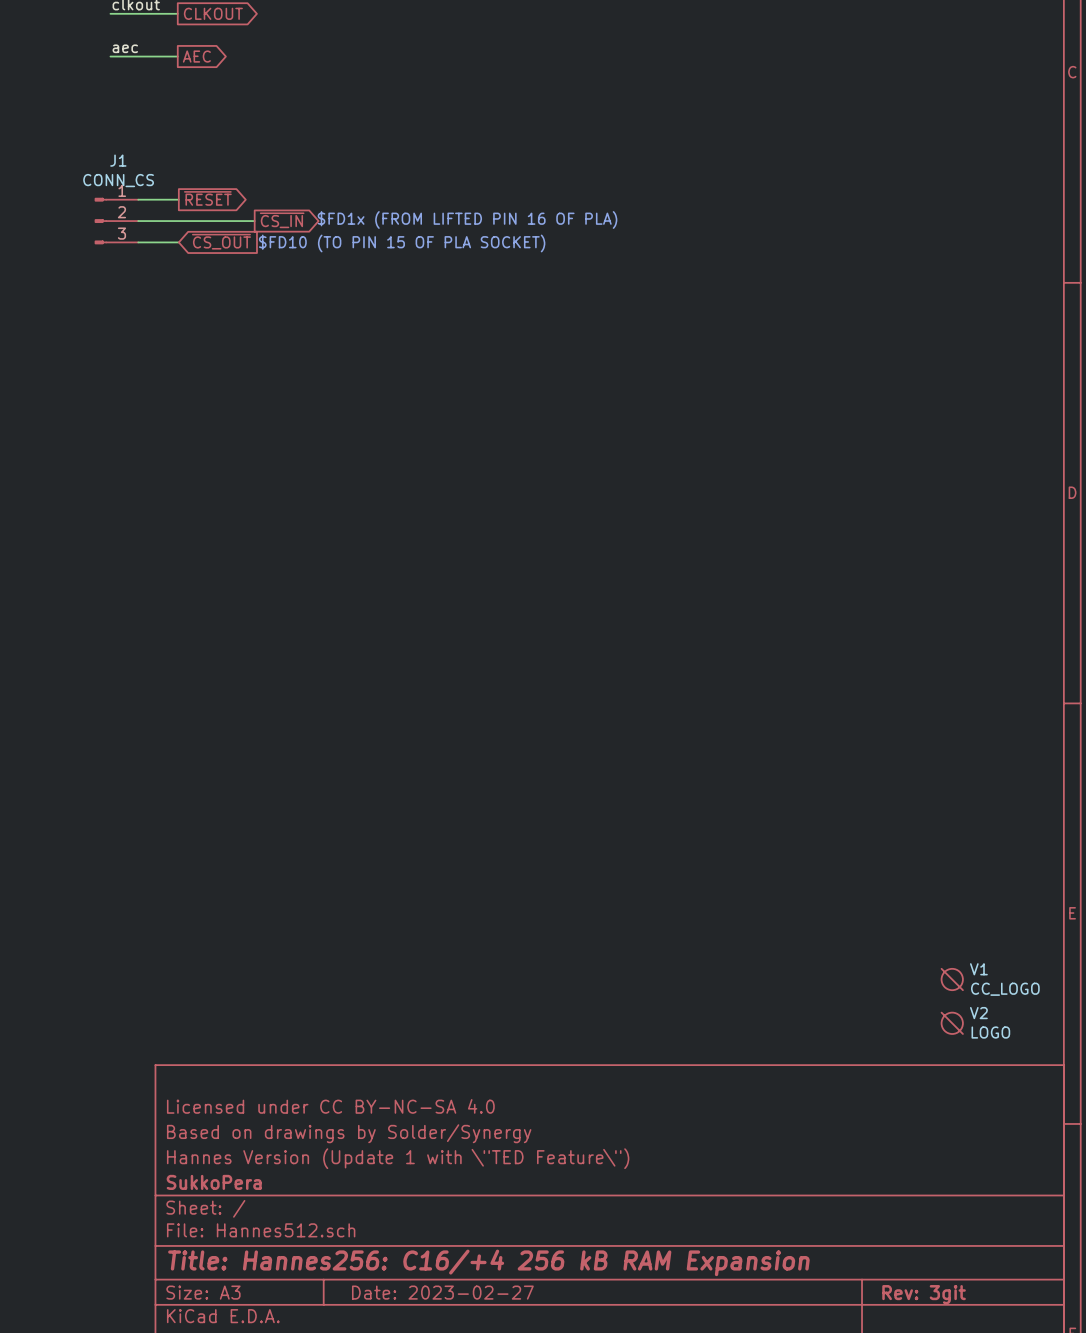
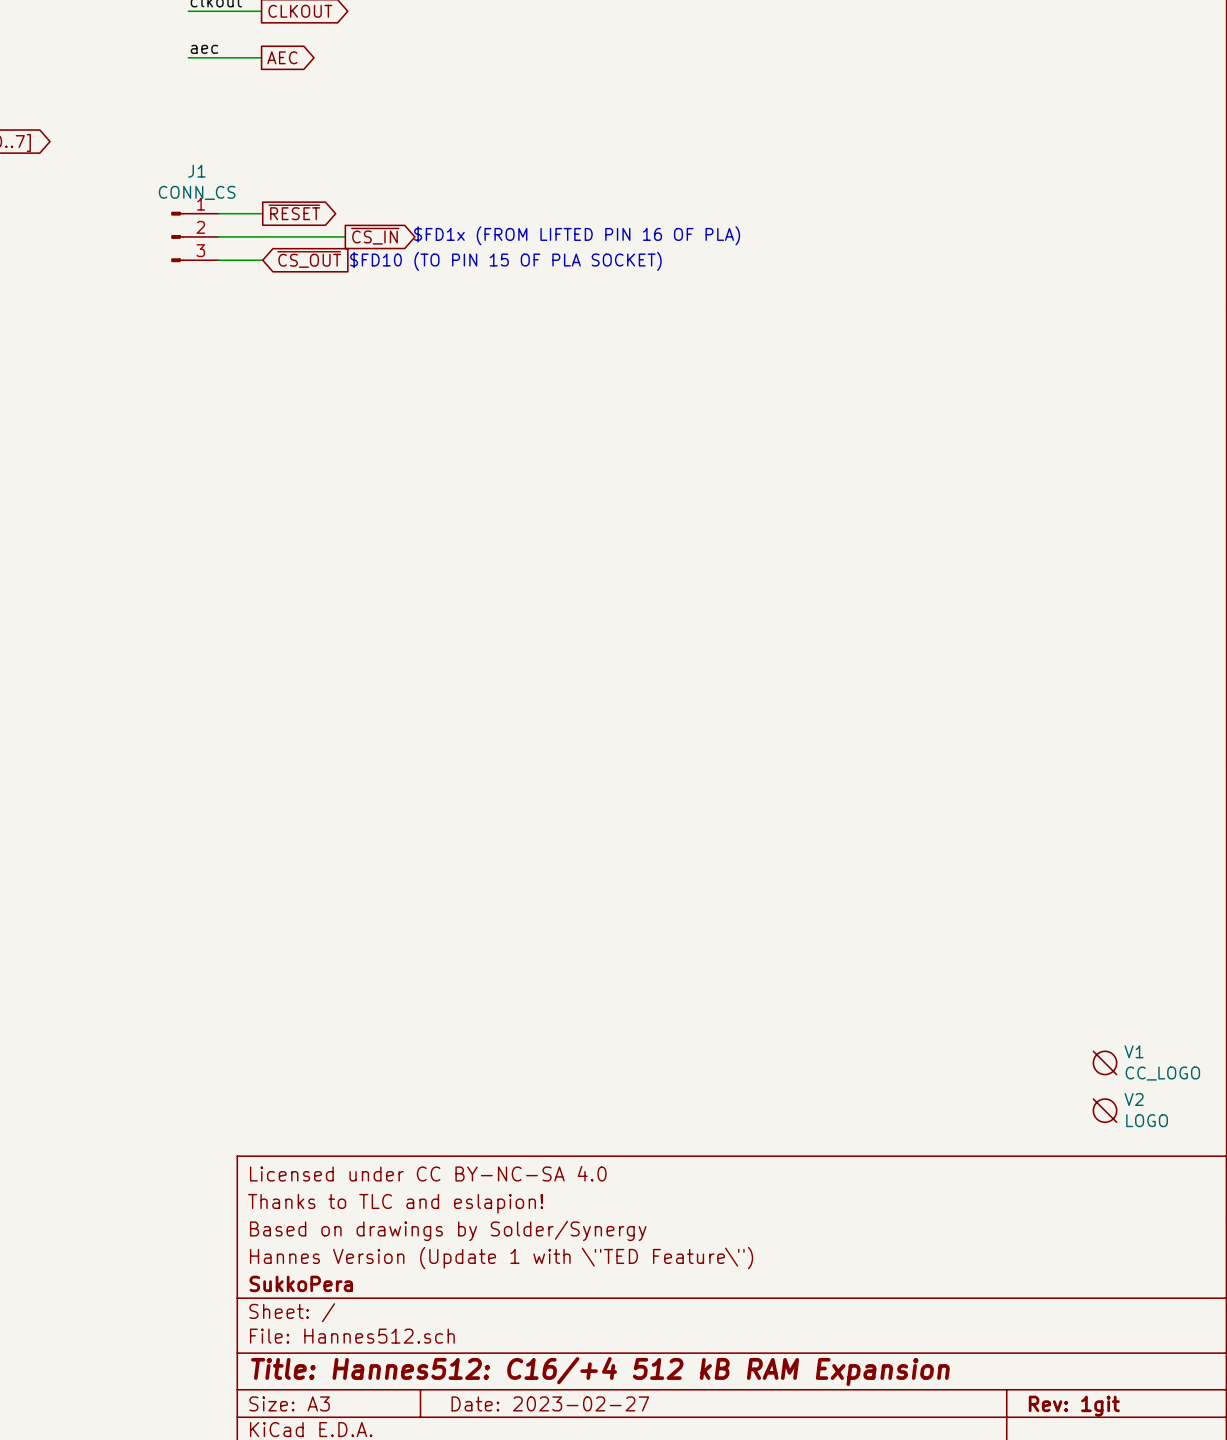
title block: none -> Licensed under CC BY-NC-SA 4.0 (428, 1173)
title block: Licensed under CC BY-NC-SA 4.0 (330, 1106) -> Thanks to TLC and eslapion! (395, 1203)
title block: Title: Hannes256: C16/+4 256 kB RAM Expansion (488, 1262) -> Title: Hannes512: C16/+4 512 kB RAM Expansion (600, 1371)
title block: Rev: 3git (924, 1294) -> Rev: 1git (1074, 1406)

